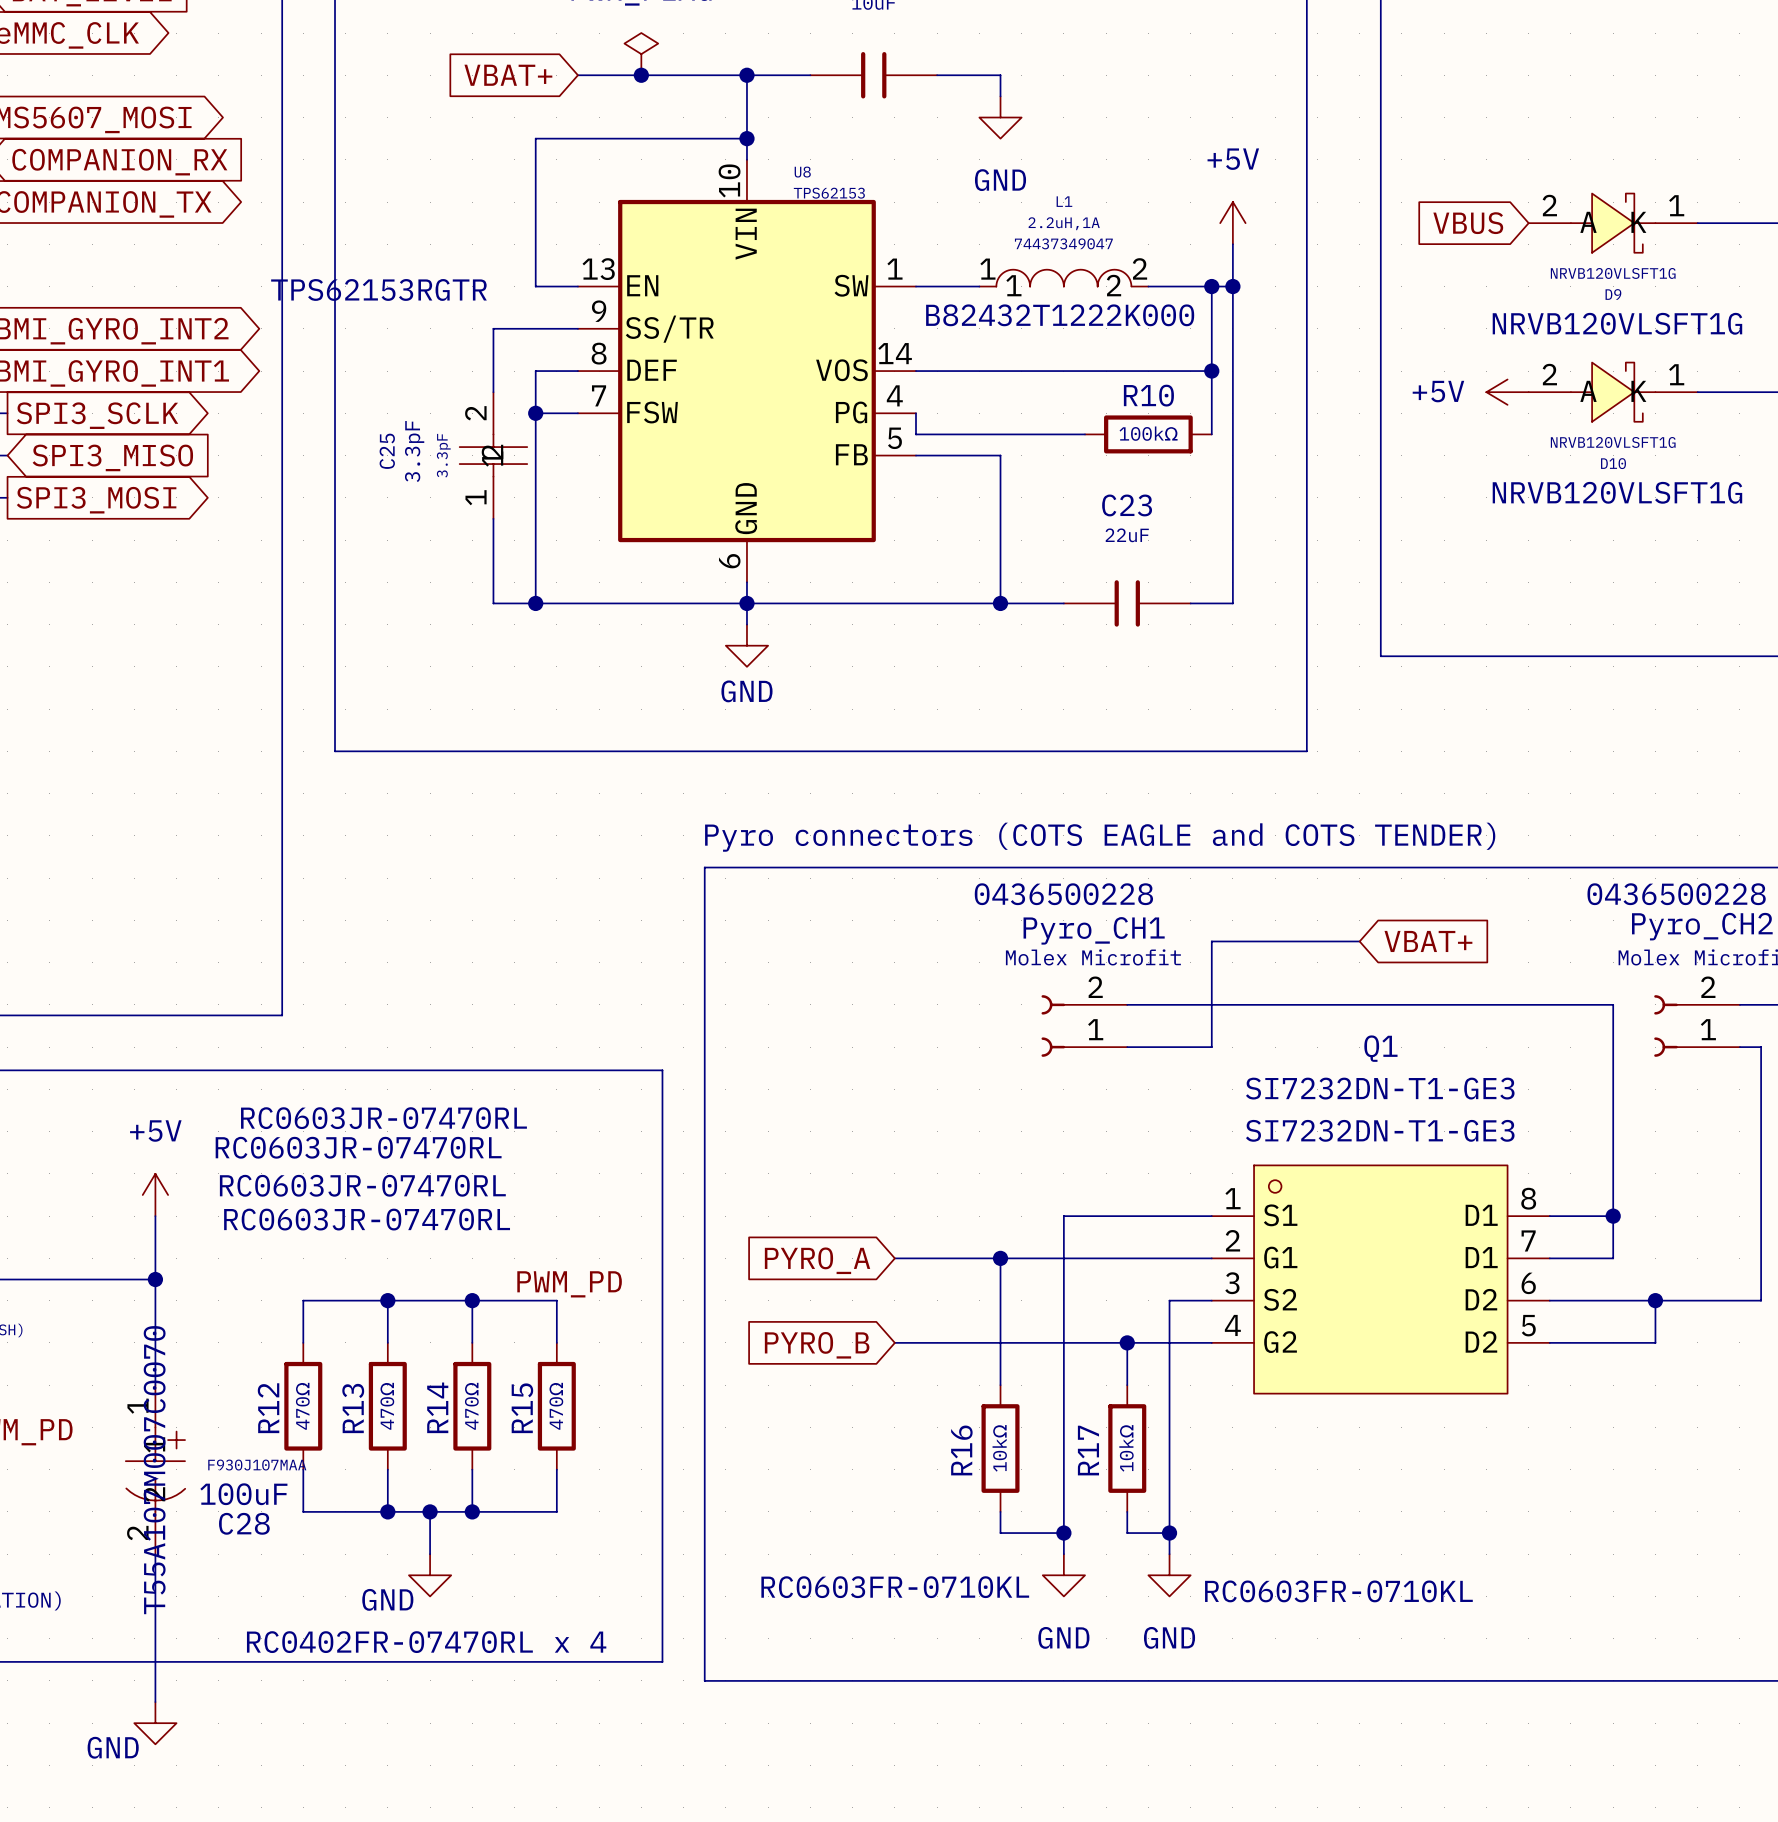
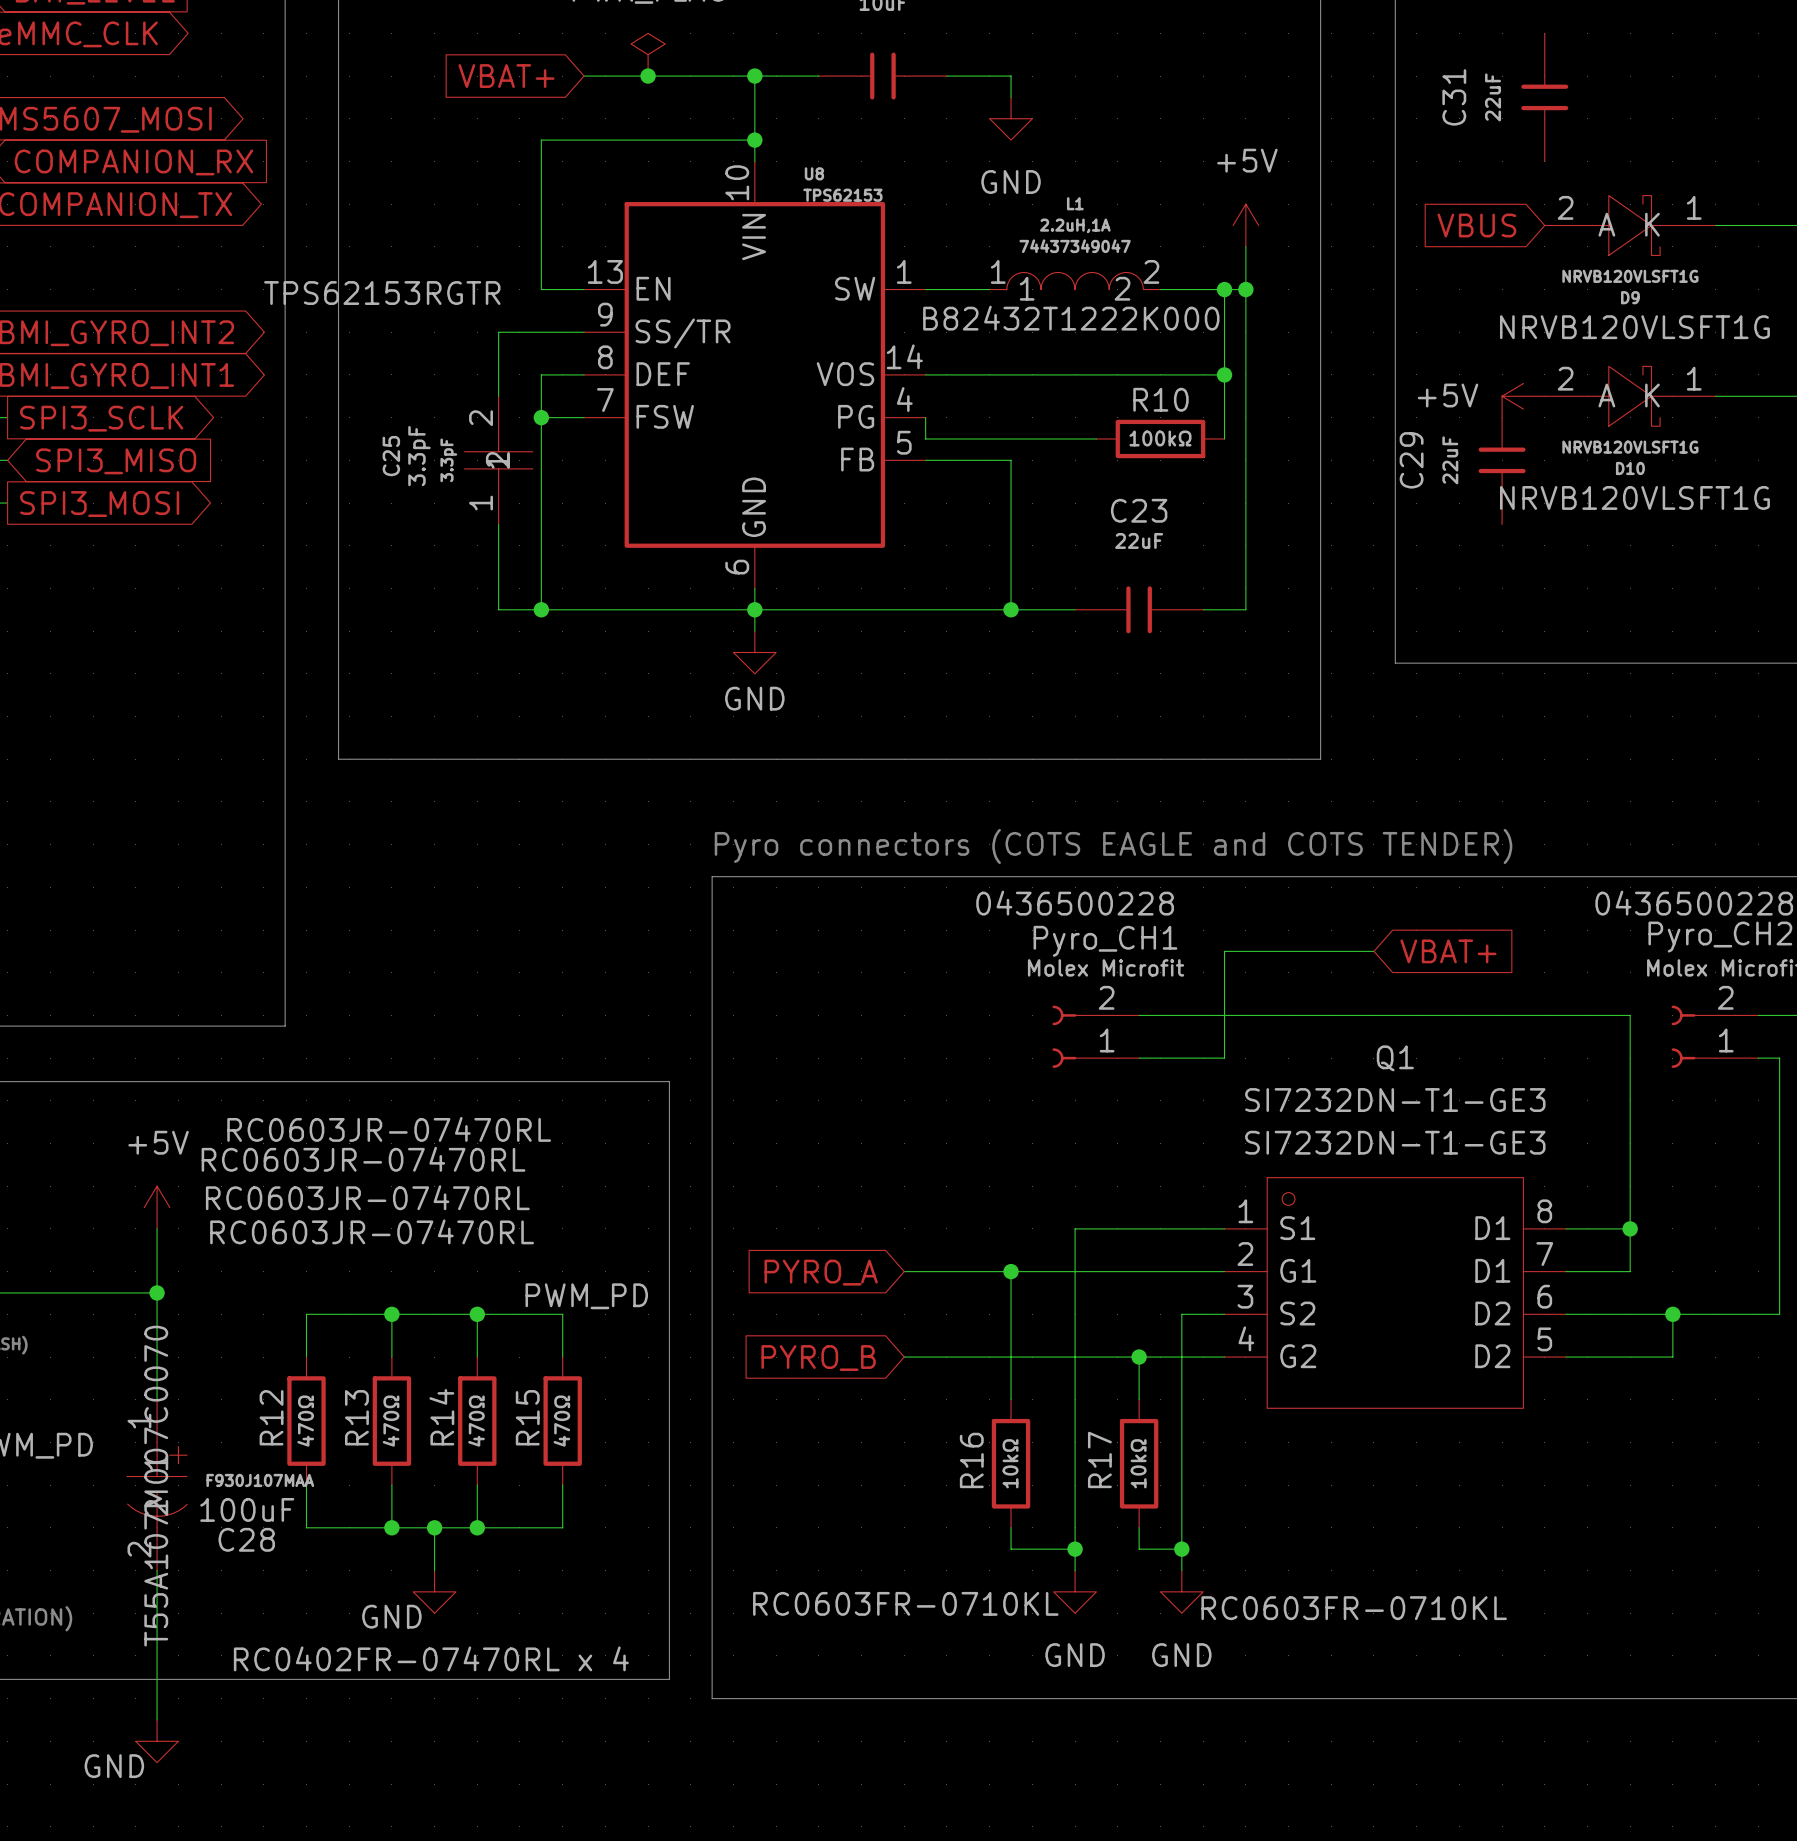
C31: none -> 22uF (1544, 97)
C29: none -> 22uF (1502, 460)

